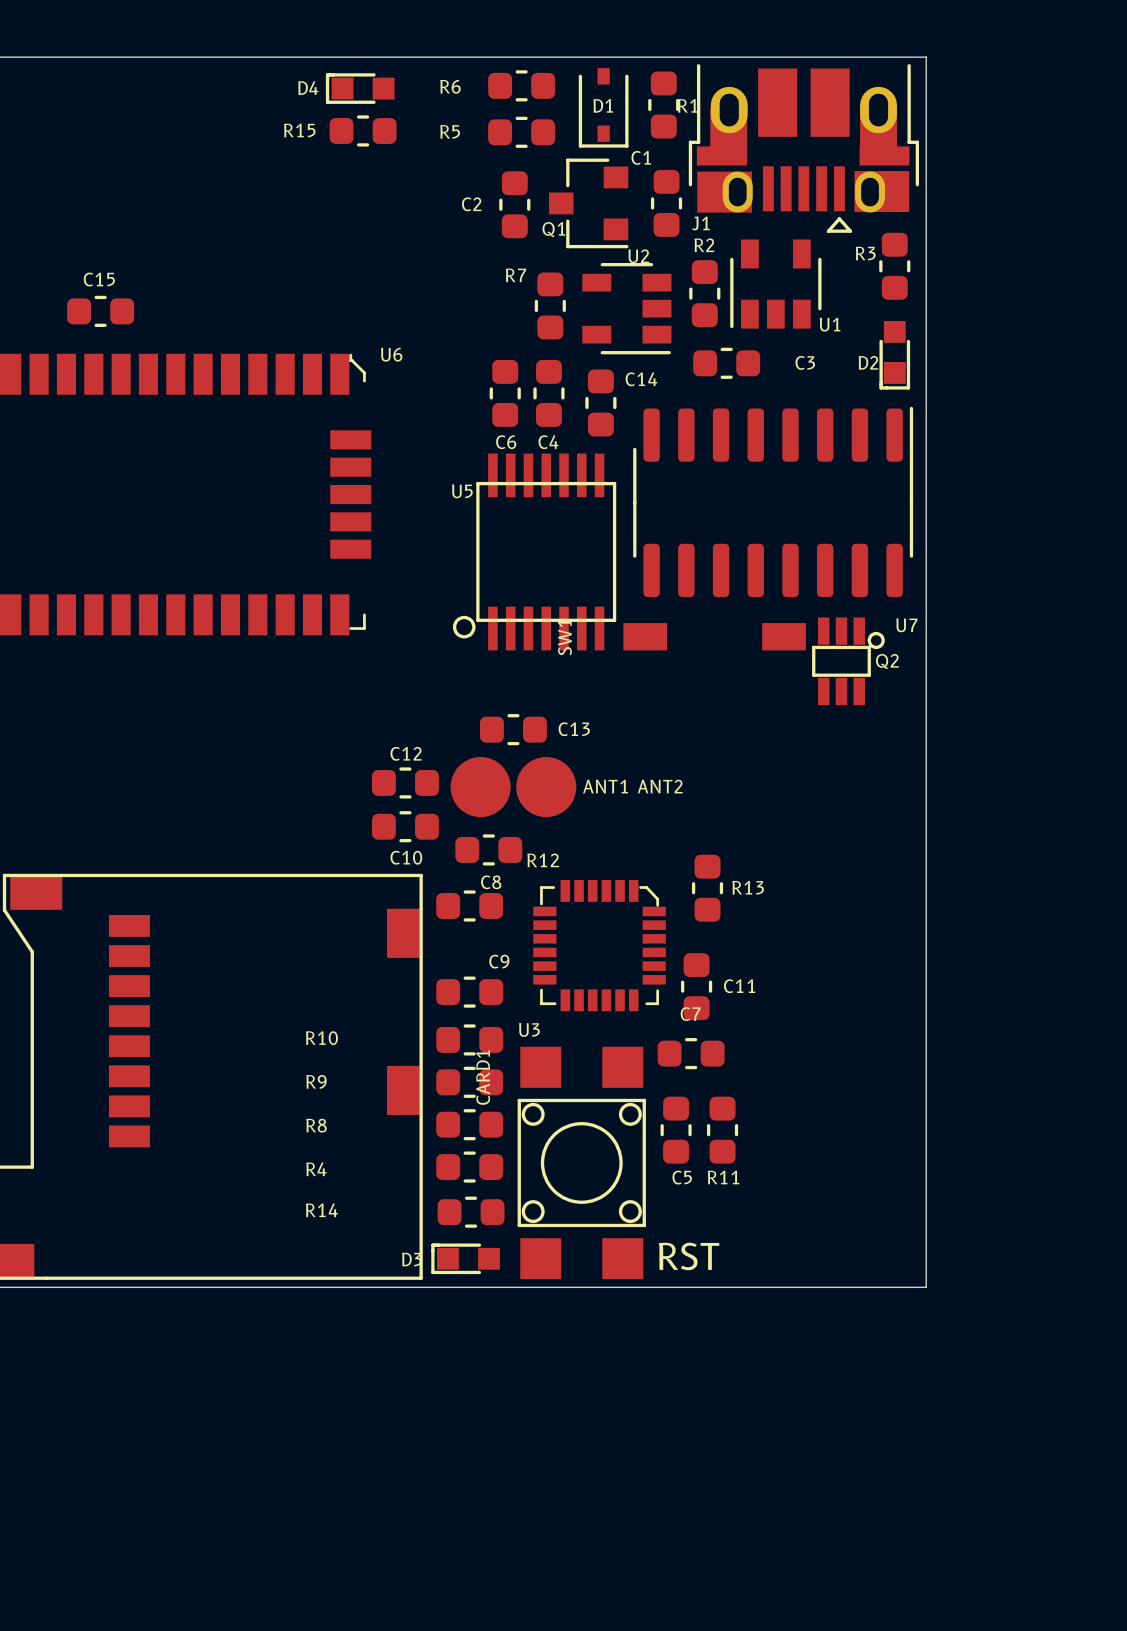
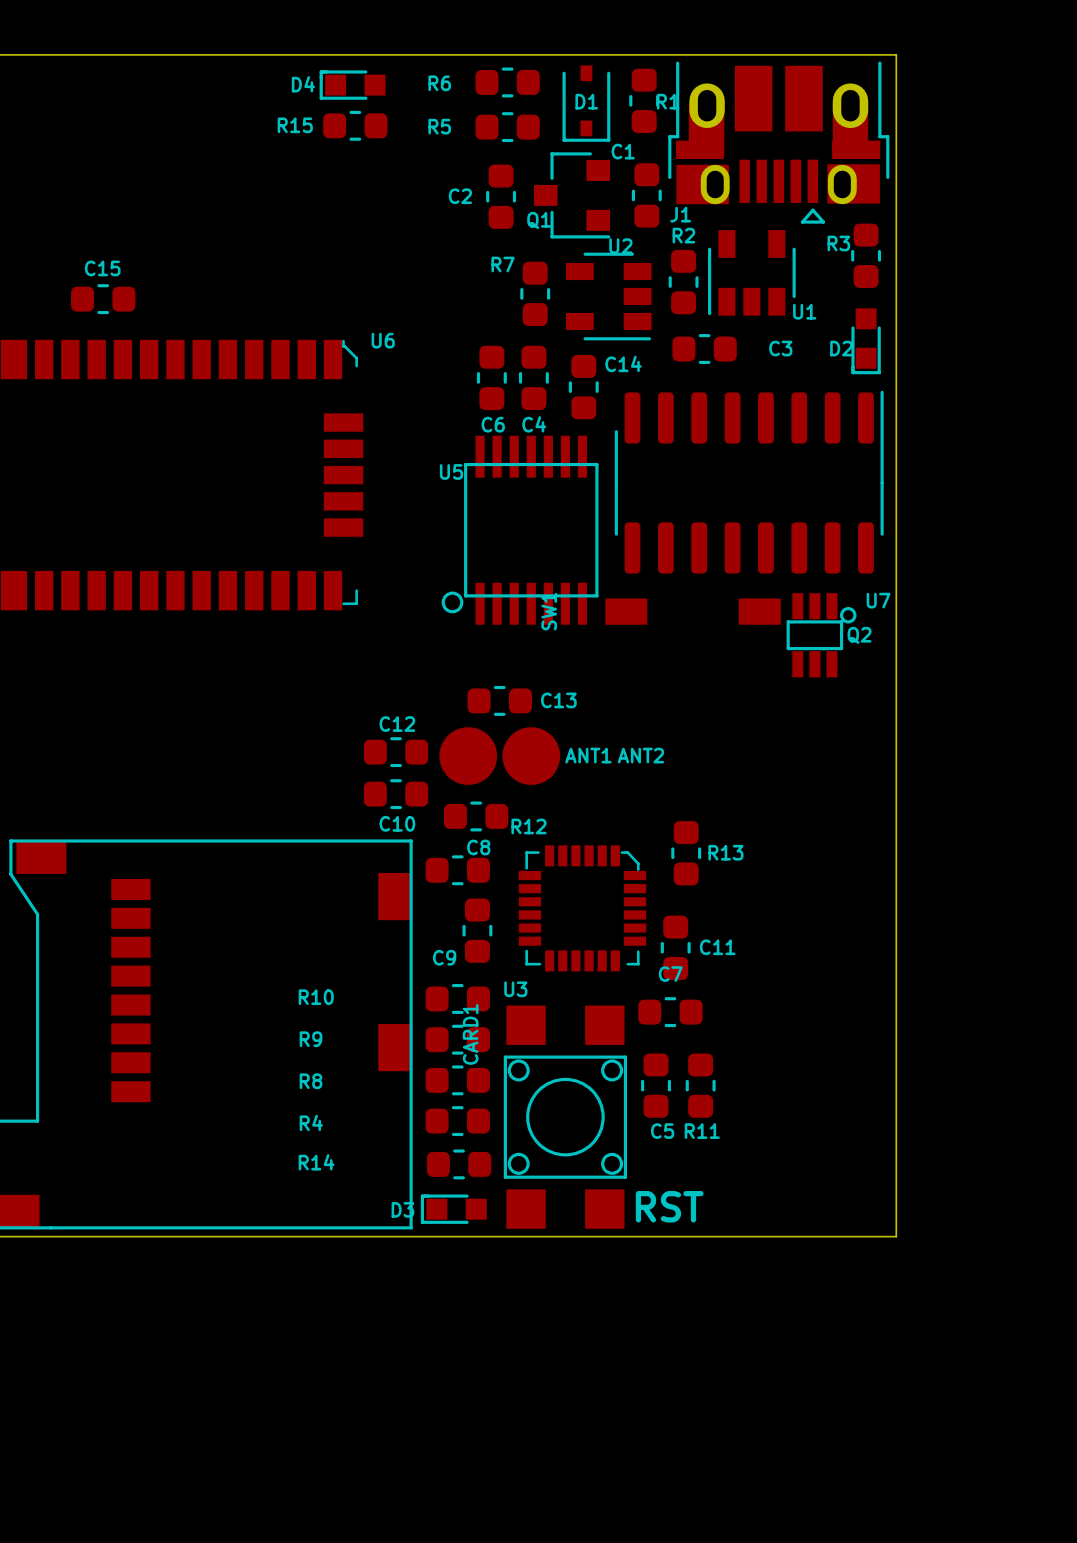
C9 name position: C9 (499, 961) -> C9 (444, 957)
C9 rotation: 0° (469, 992) -> 90° clockwise (477, 930)

